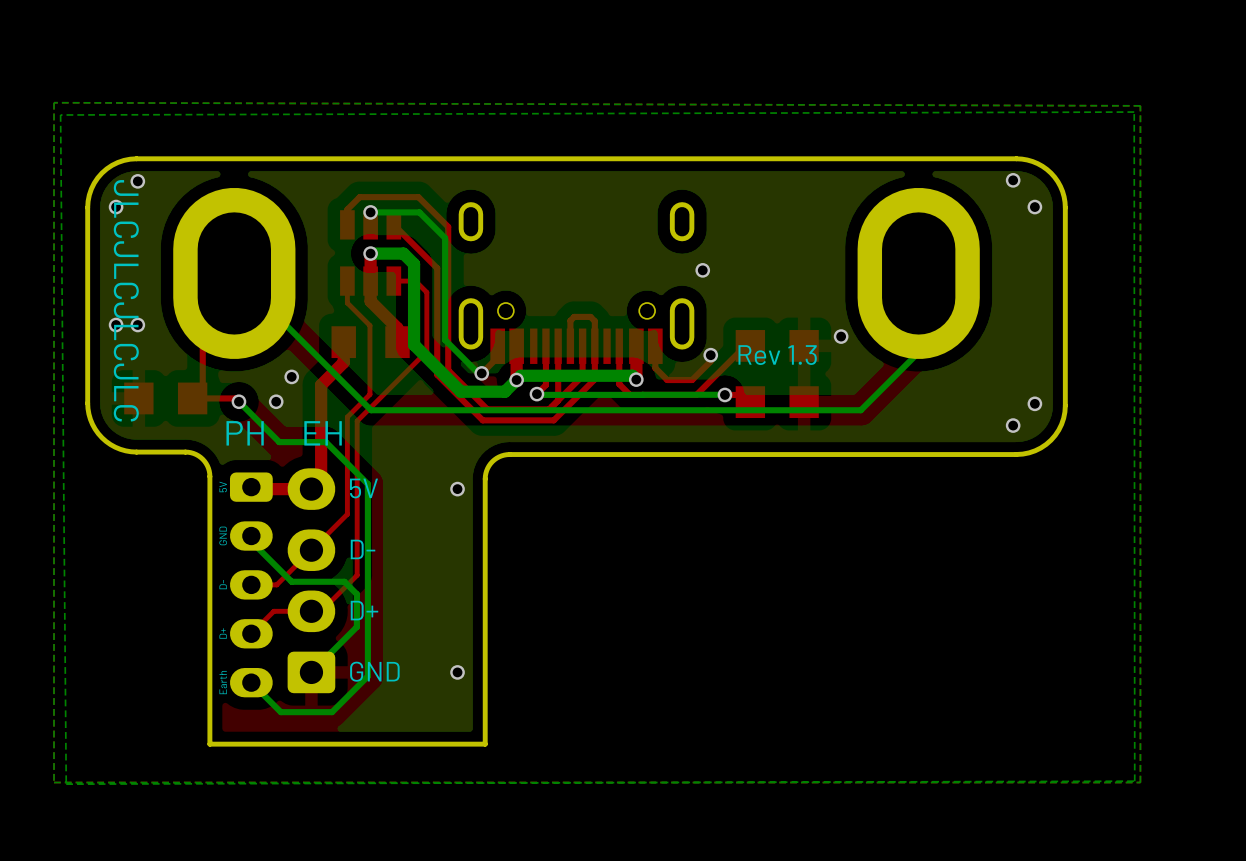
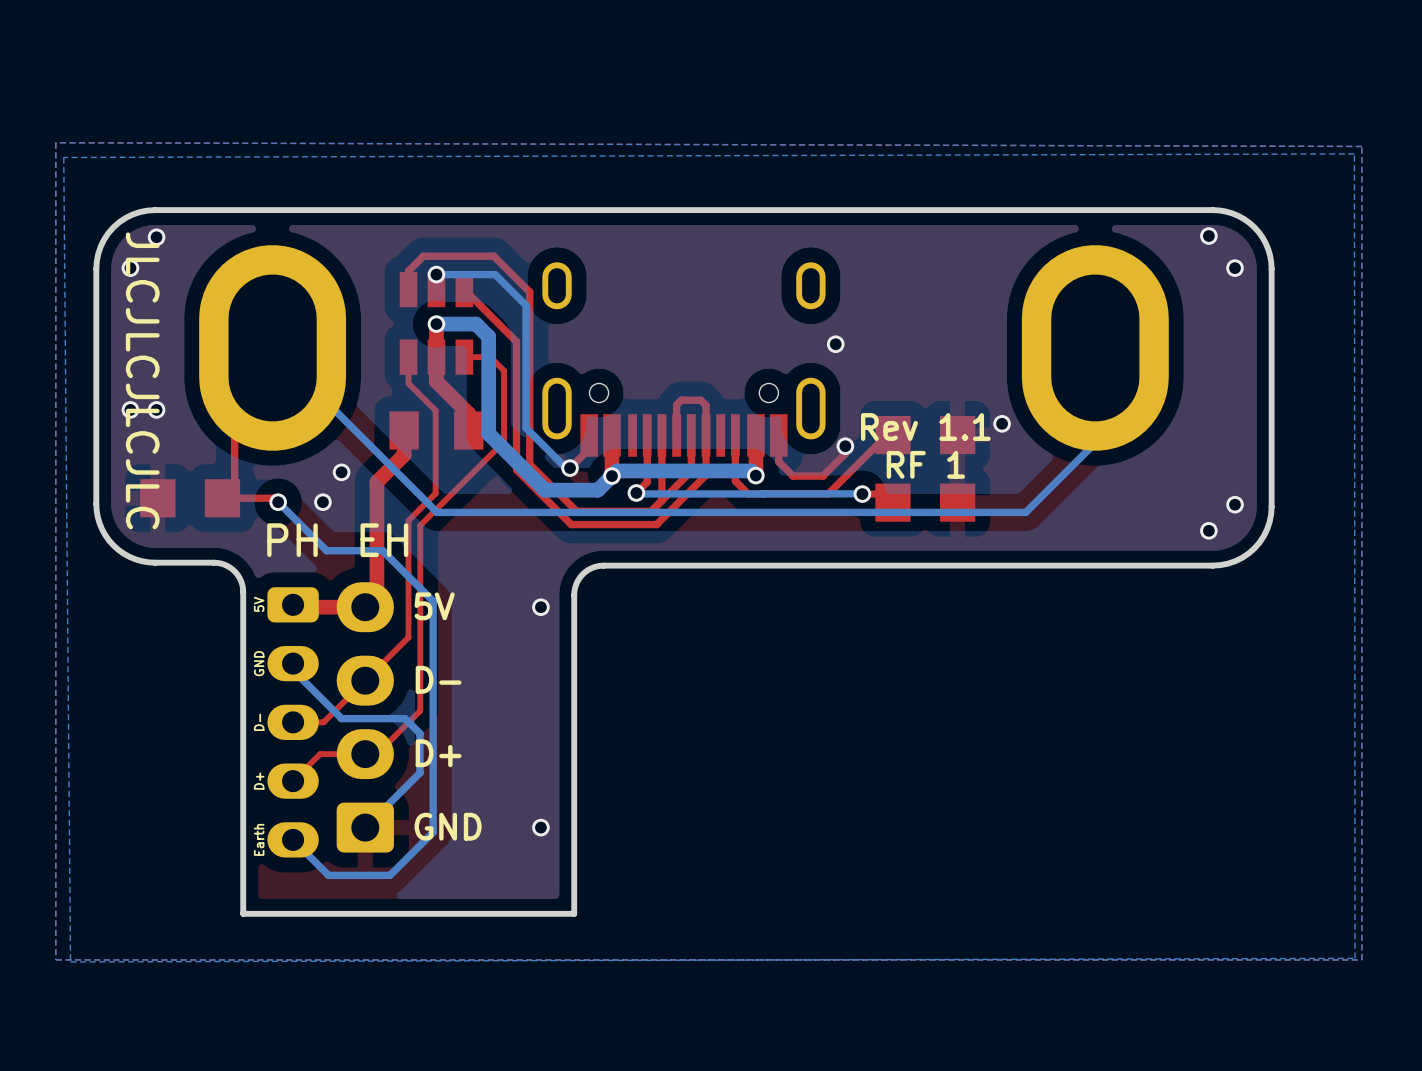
text: Rev 1.3 (777, 355) -> Rev 1.1 (925, 427)
text: none -> RF 1 (925, 464)

